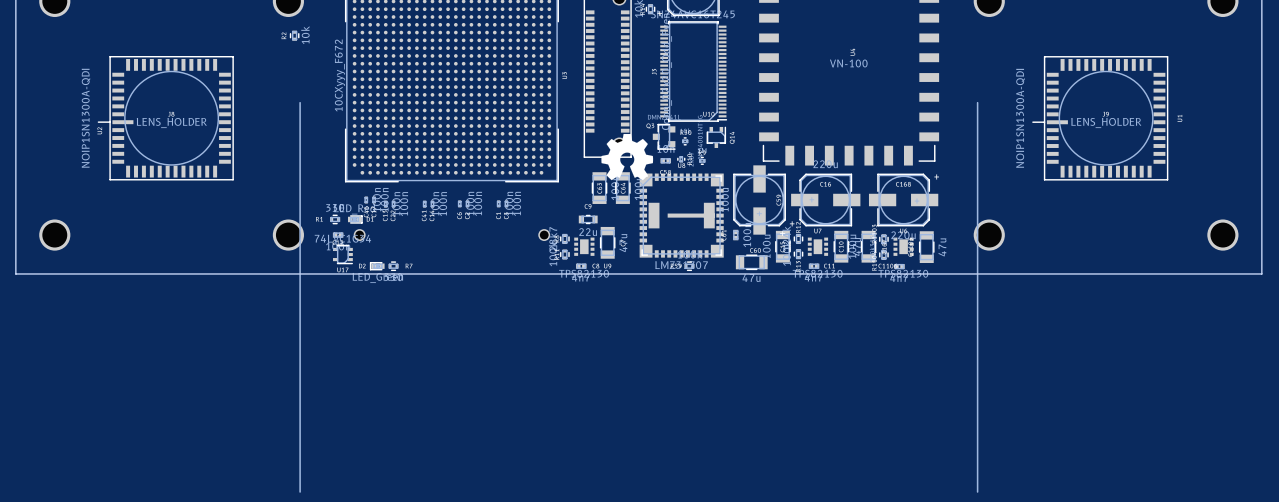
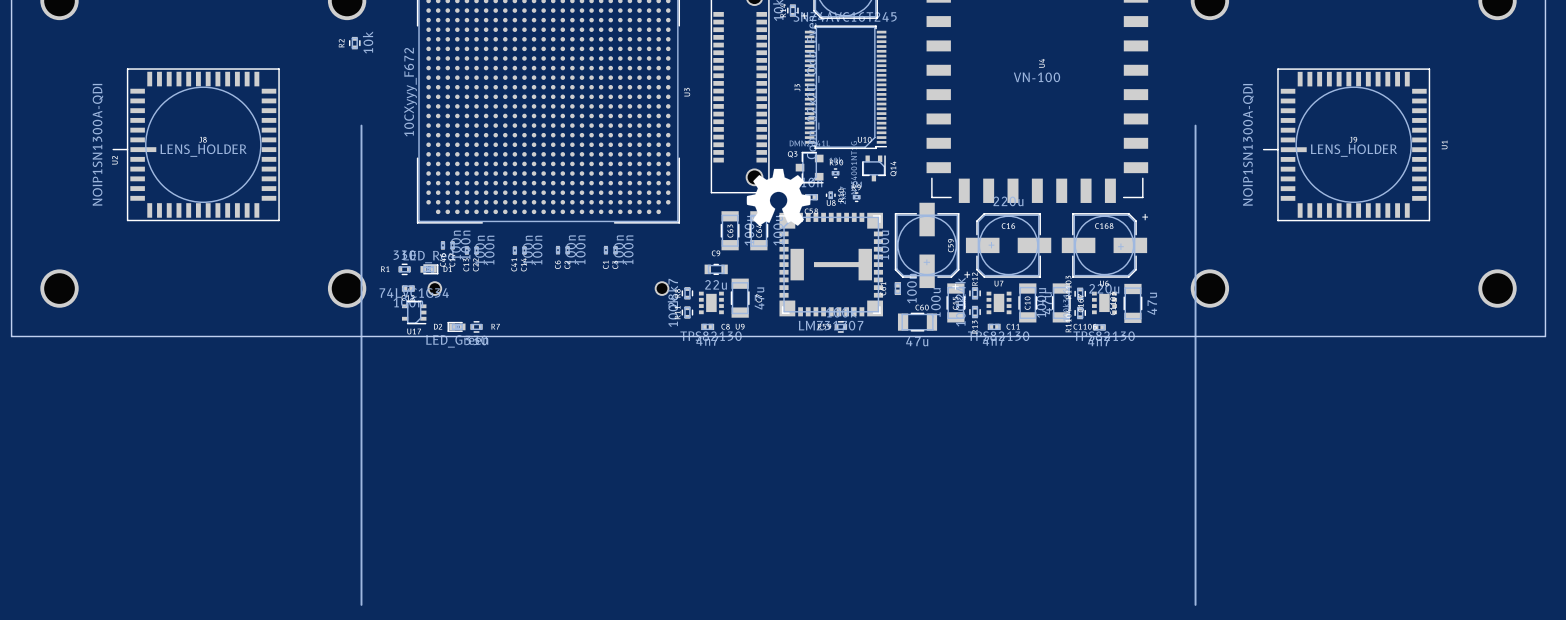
drawing position: (627, 157) -> (778, 197)

